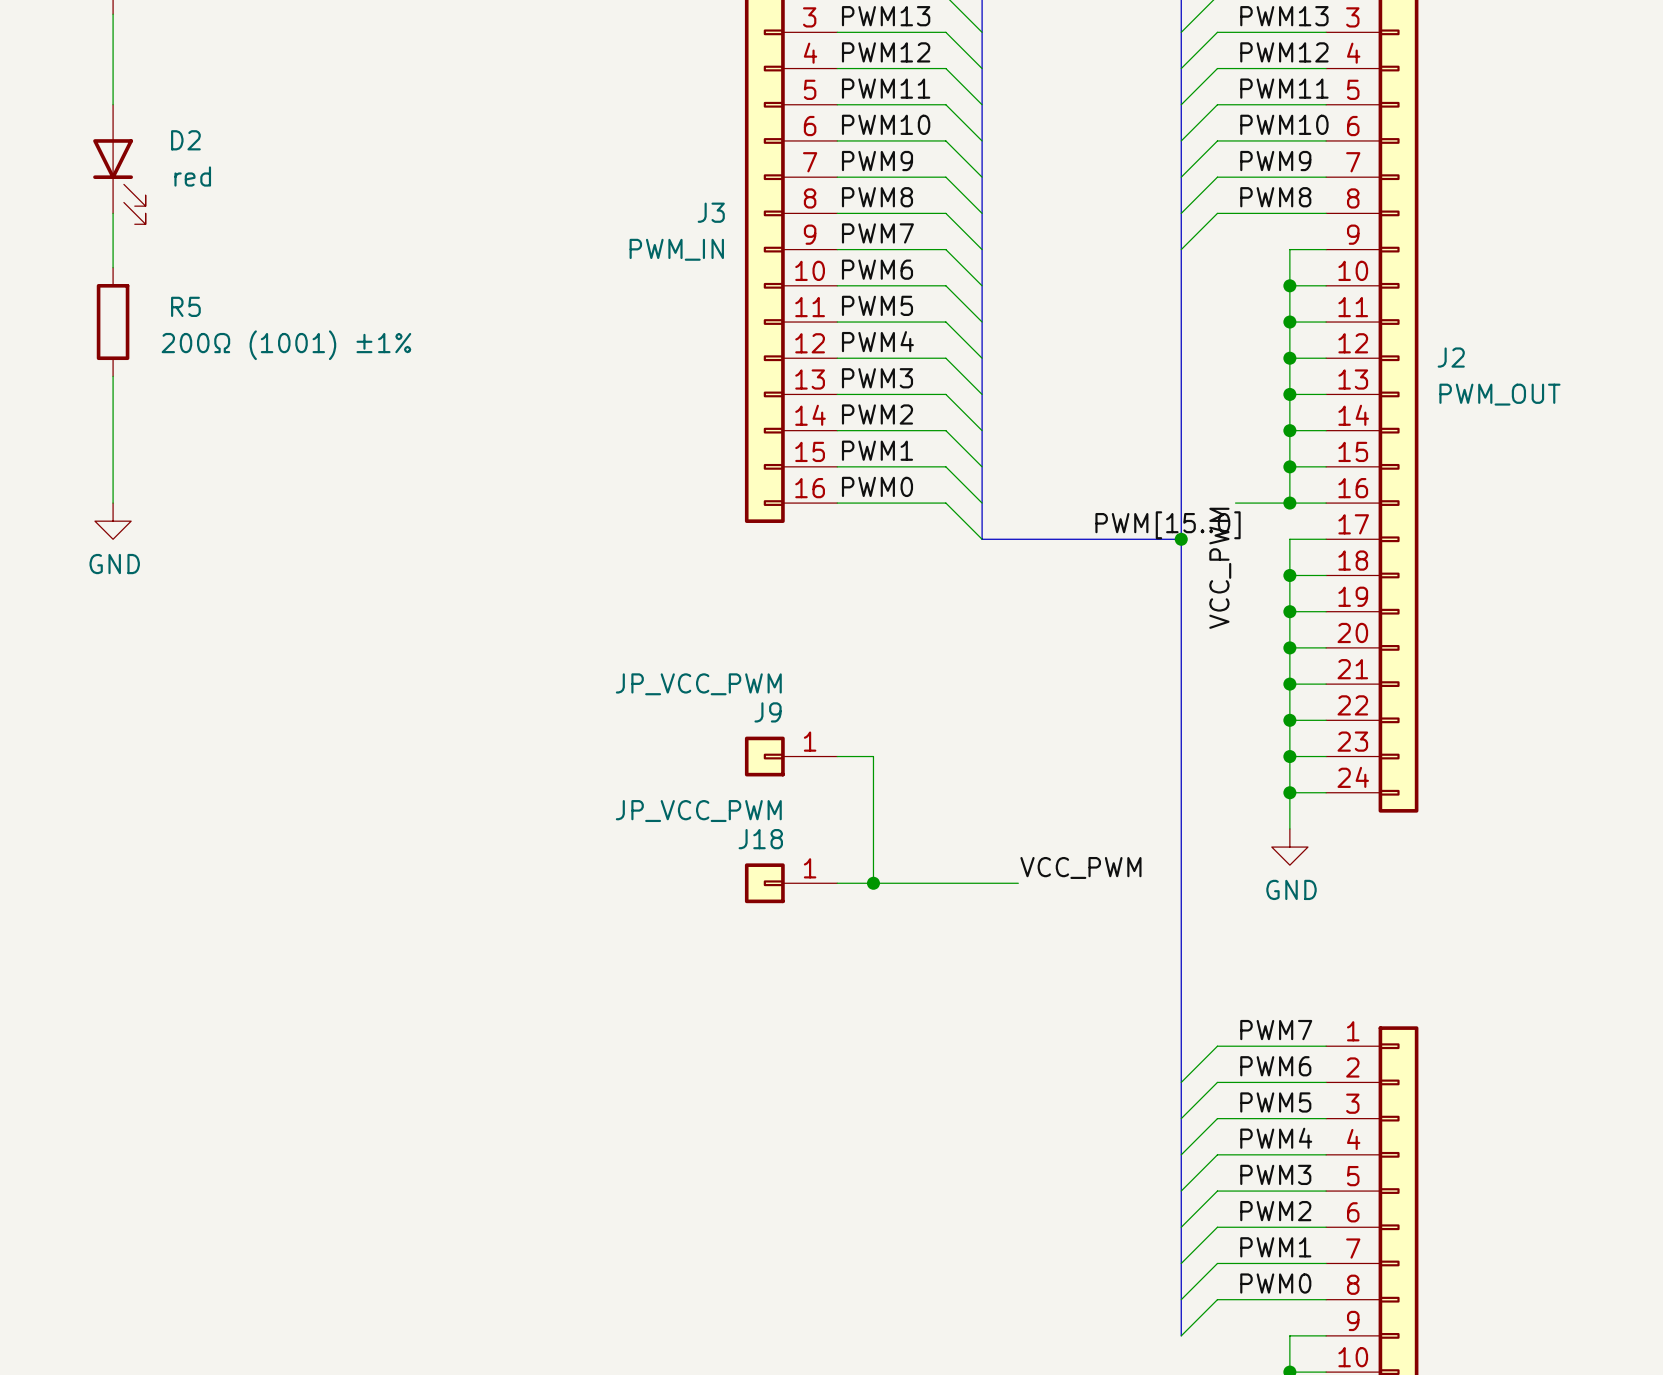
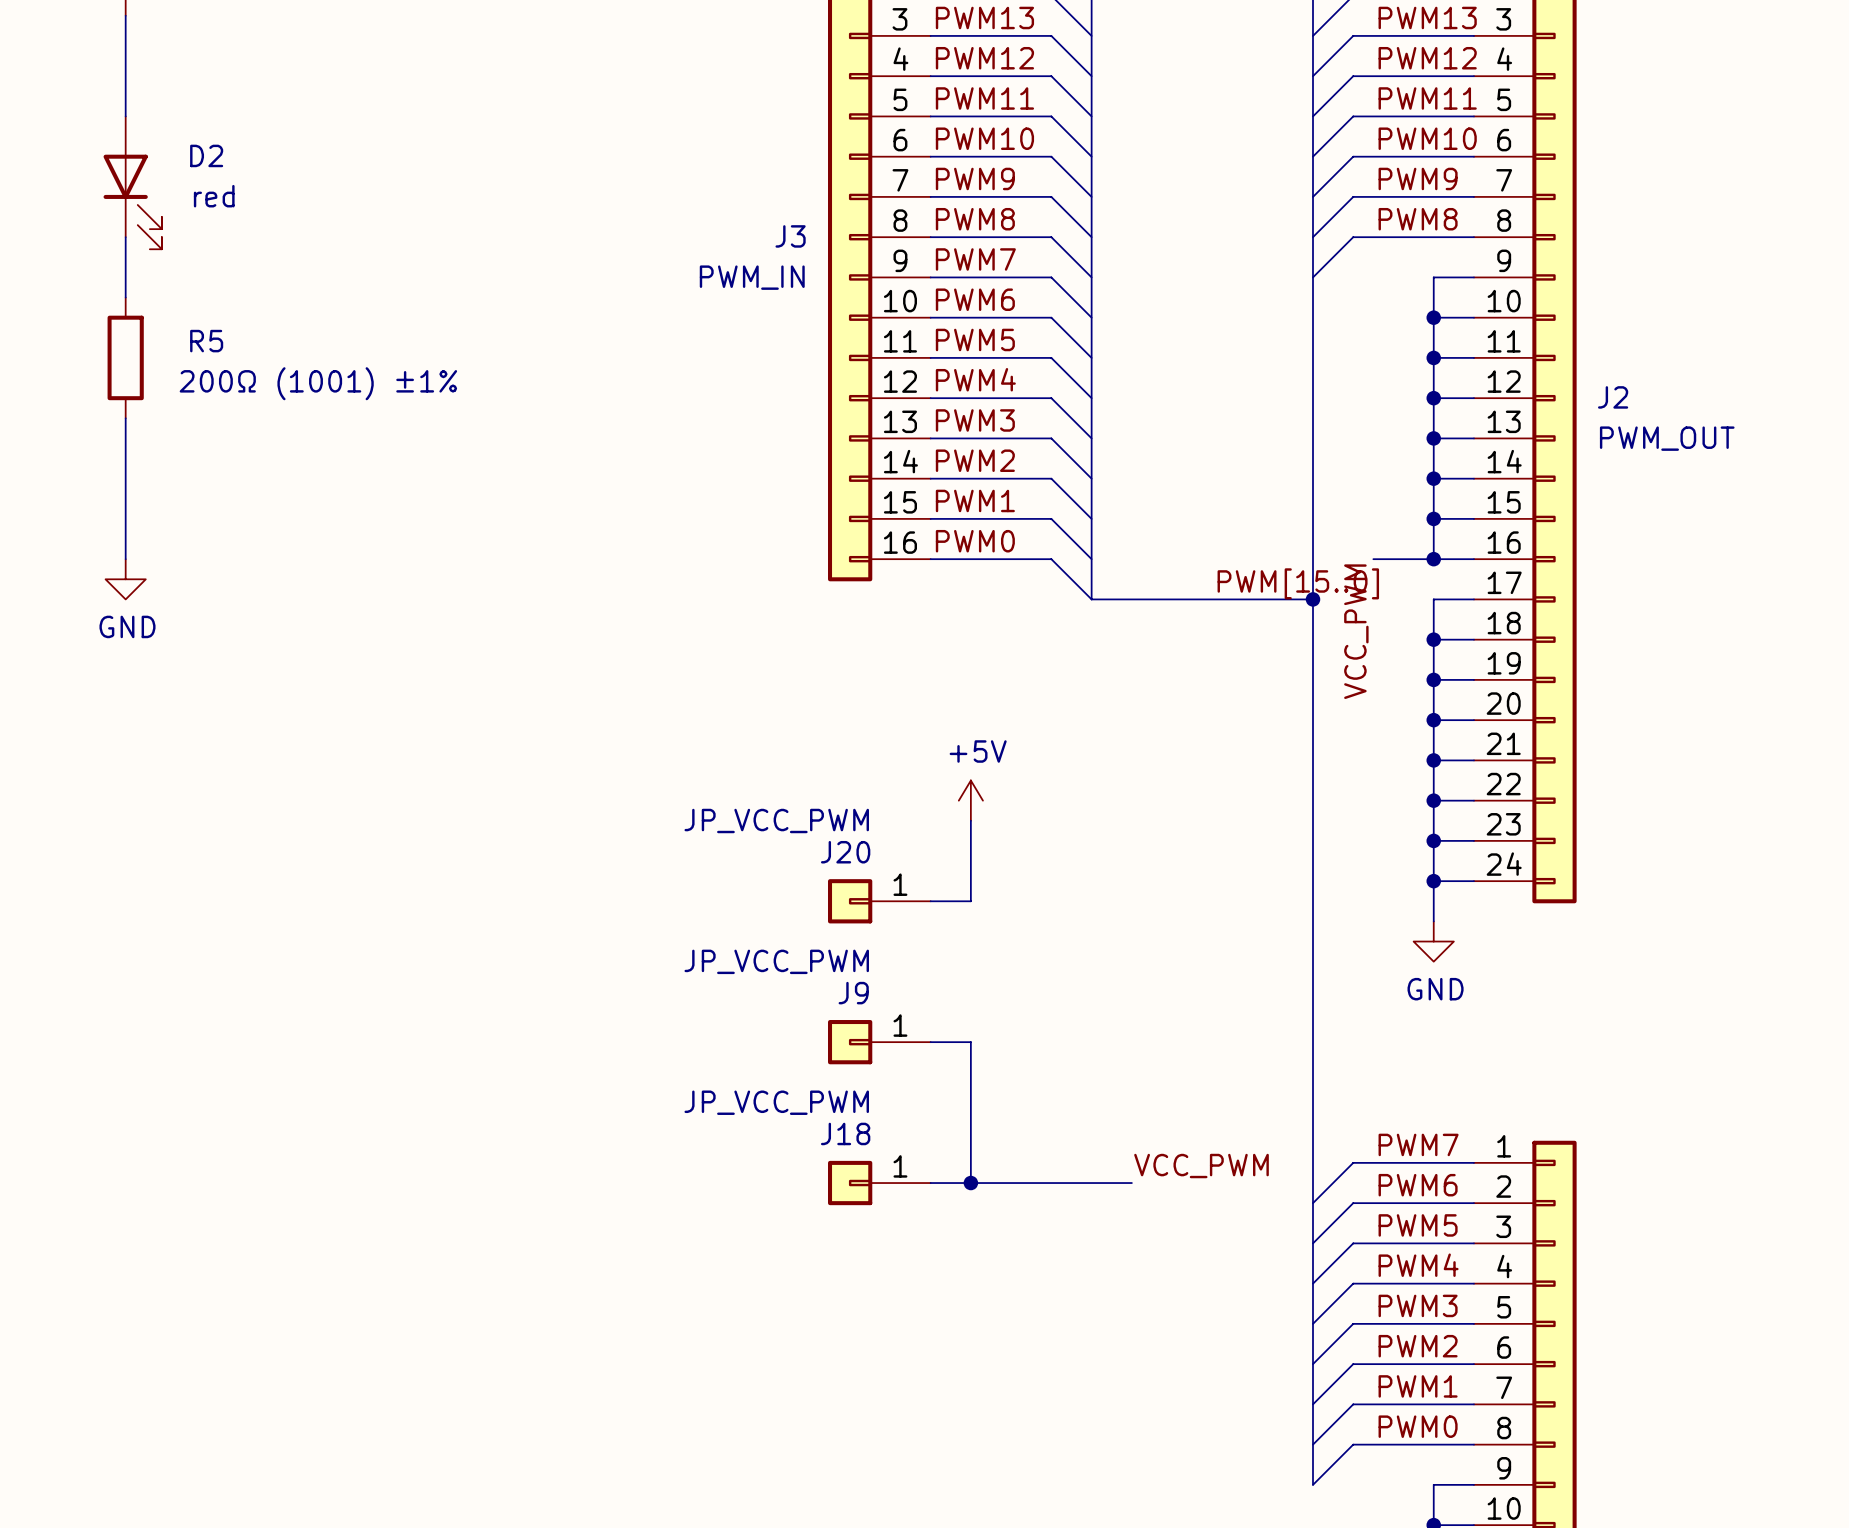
power symbol: none -> +5V (970, 800)
J9 position: (791, 756) -> (879, 1042)
wire: (837, 756) (873, 756) -> (970, 820) (970, 840)
J20: none -> JP_VCC_PWM (879, 901)
wire: (873, 810) (873, 883) -> (970, 901) (930, 901)
label position: VCC_PWM (1080, 867) -> VCC_PWM (1201, 1166)
J18 position: (791, 883) -> (879, 1183)
wire: (837, 883) (1018, 883) -> (930, 1183) (1131, 1183)
junction: (873, 883) -> none
wire: none -> (930, 1042) (970, 1042) (970, 1183)
junction: none -> (970, 1183)

